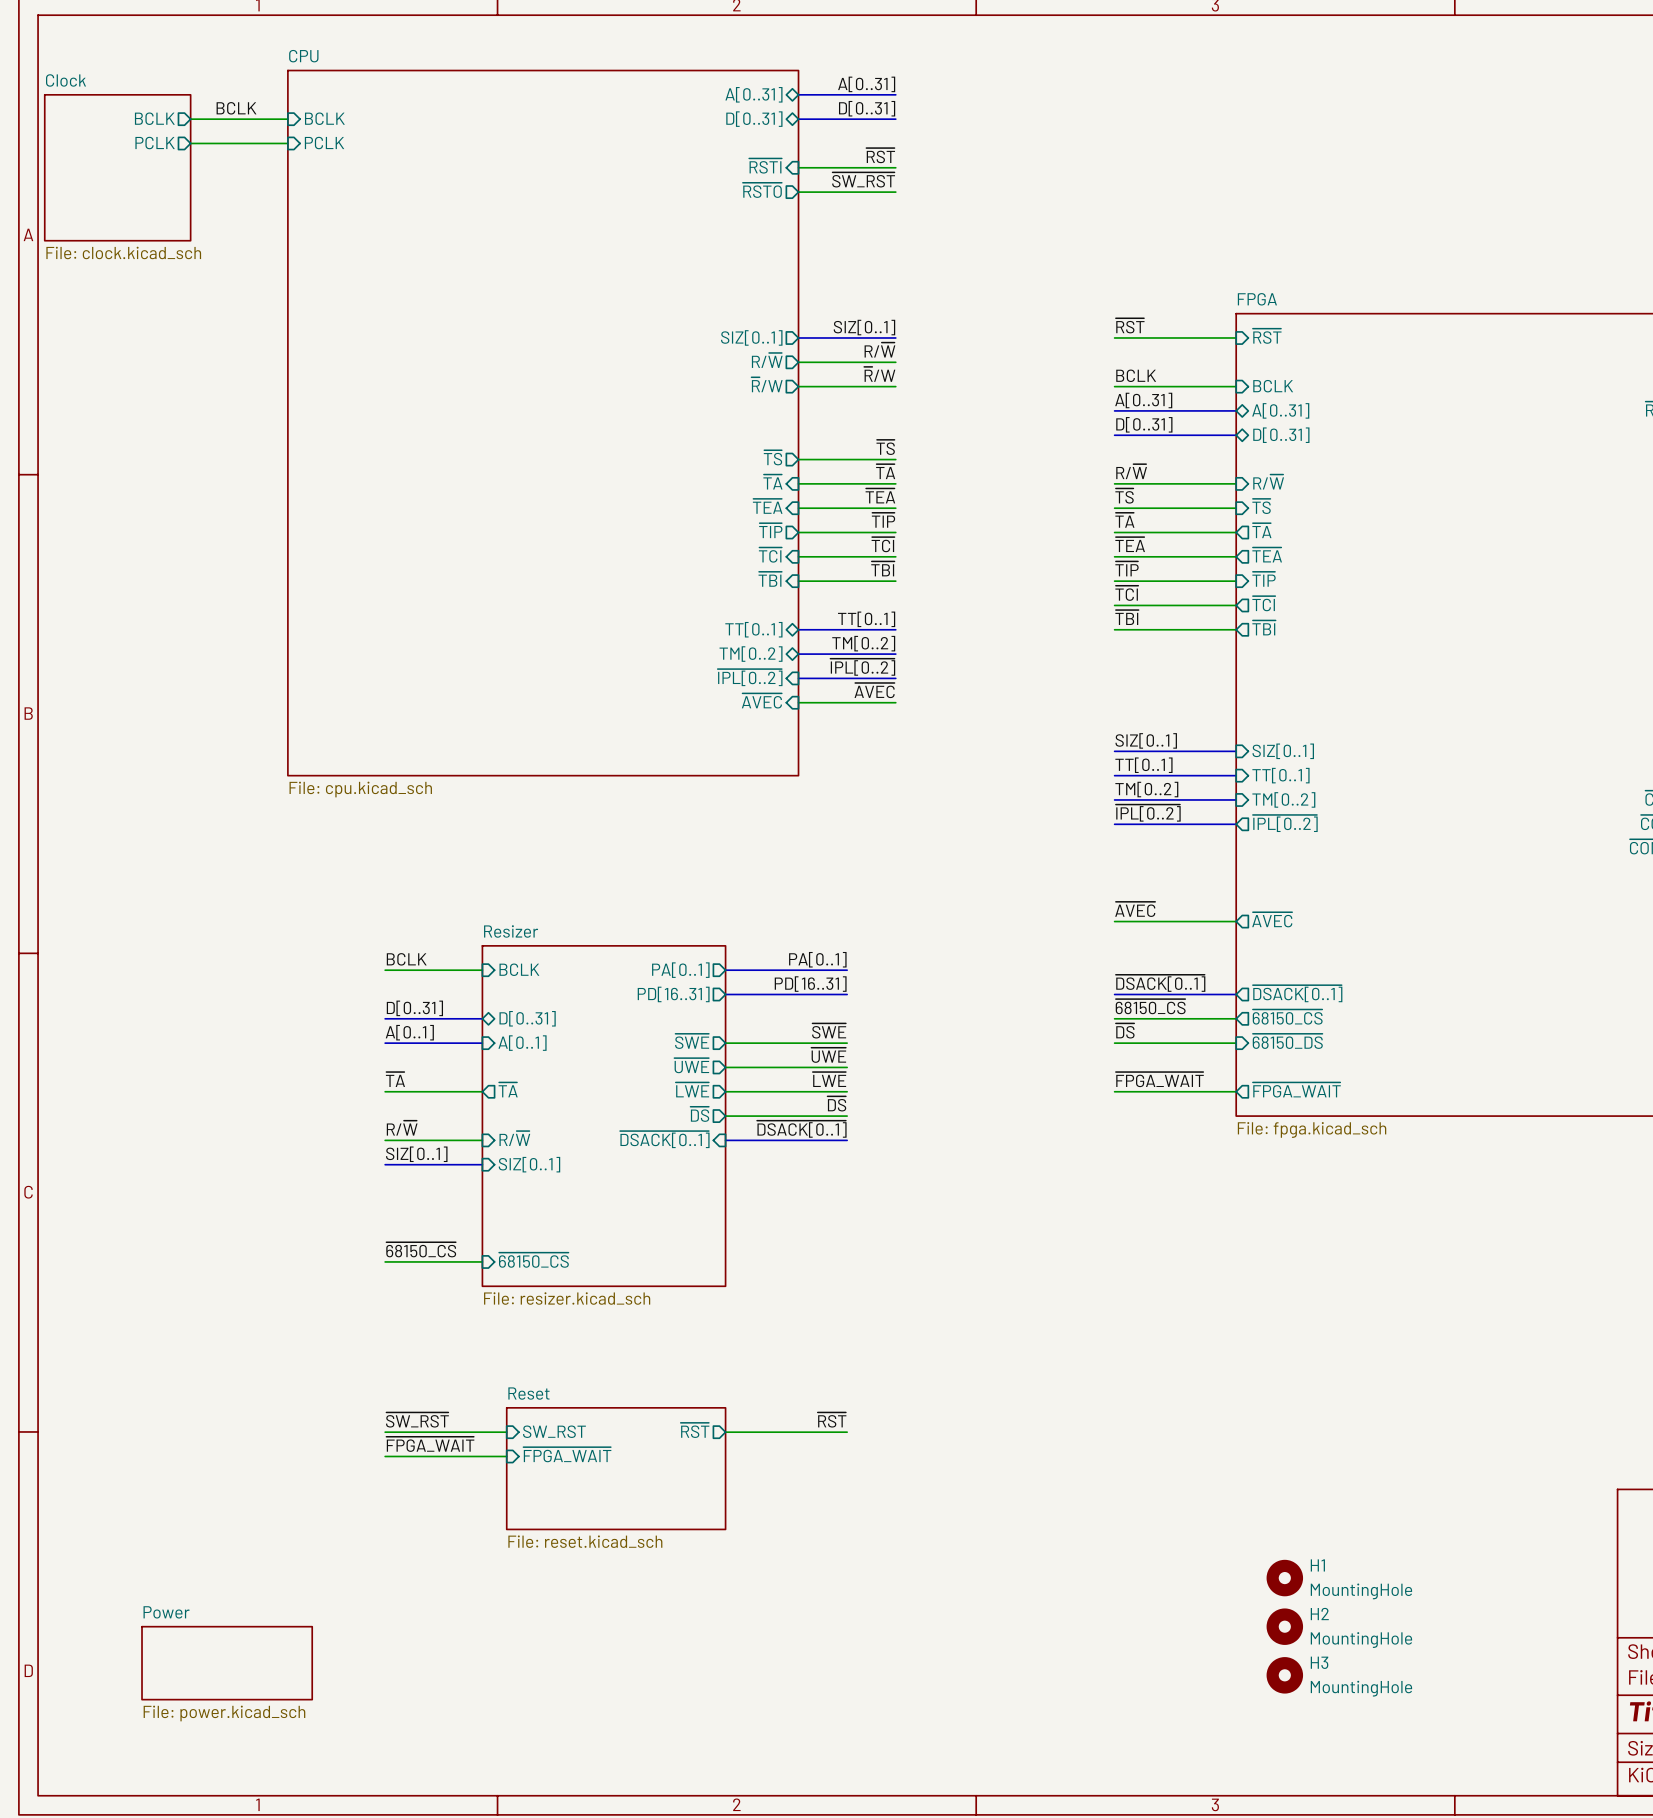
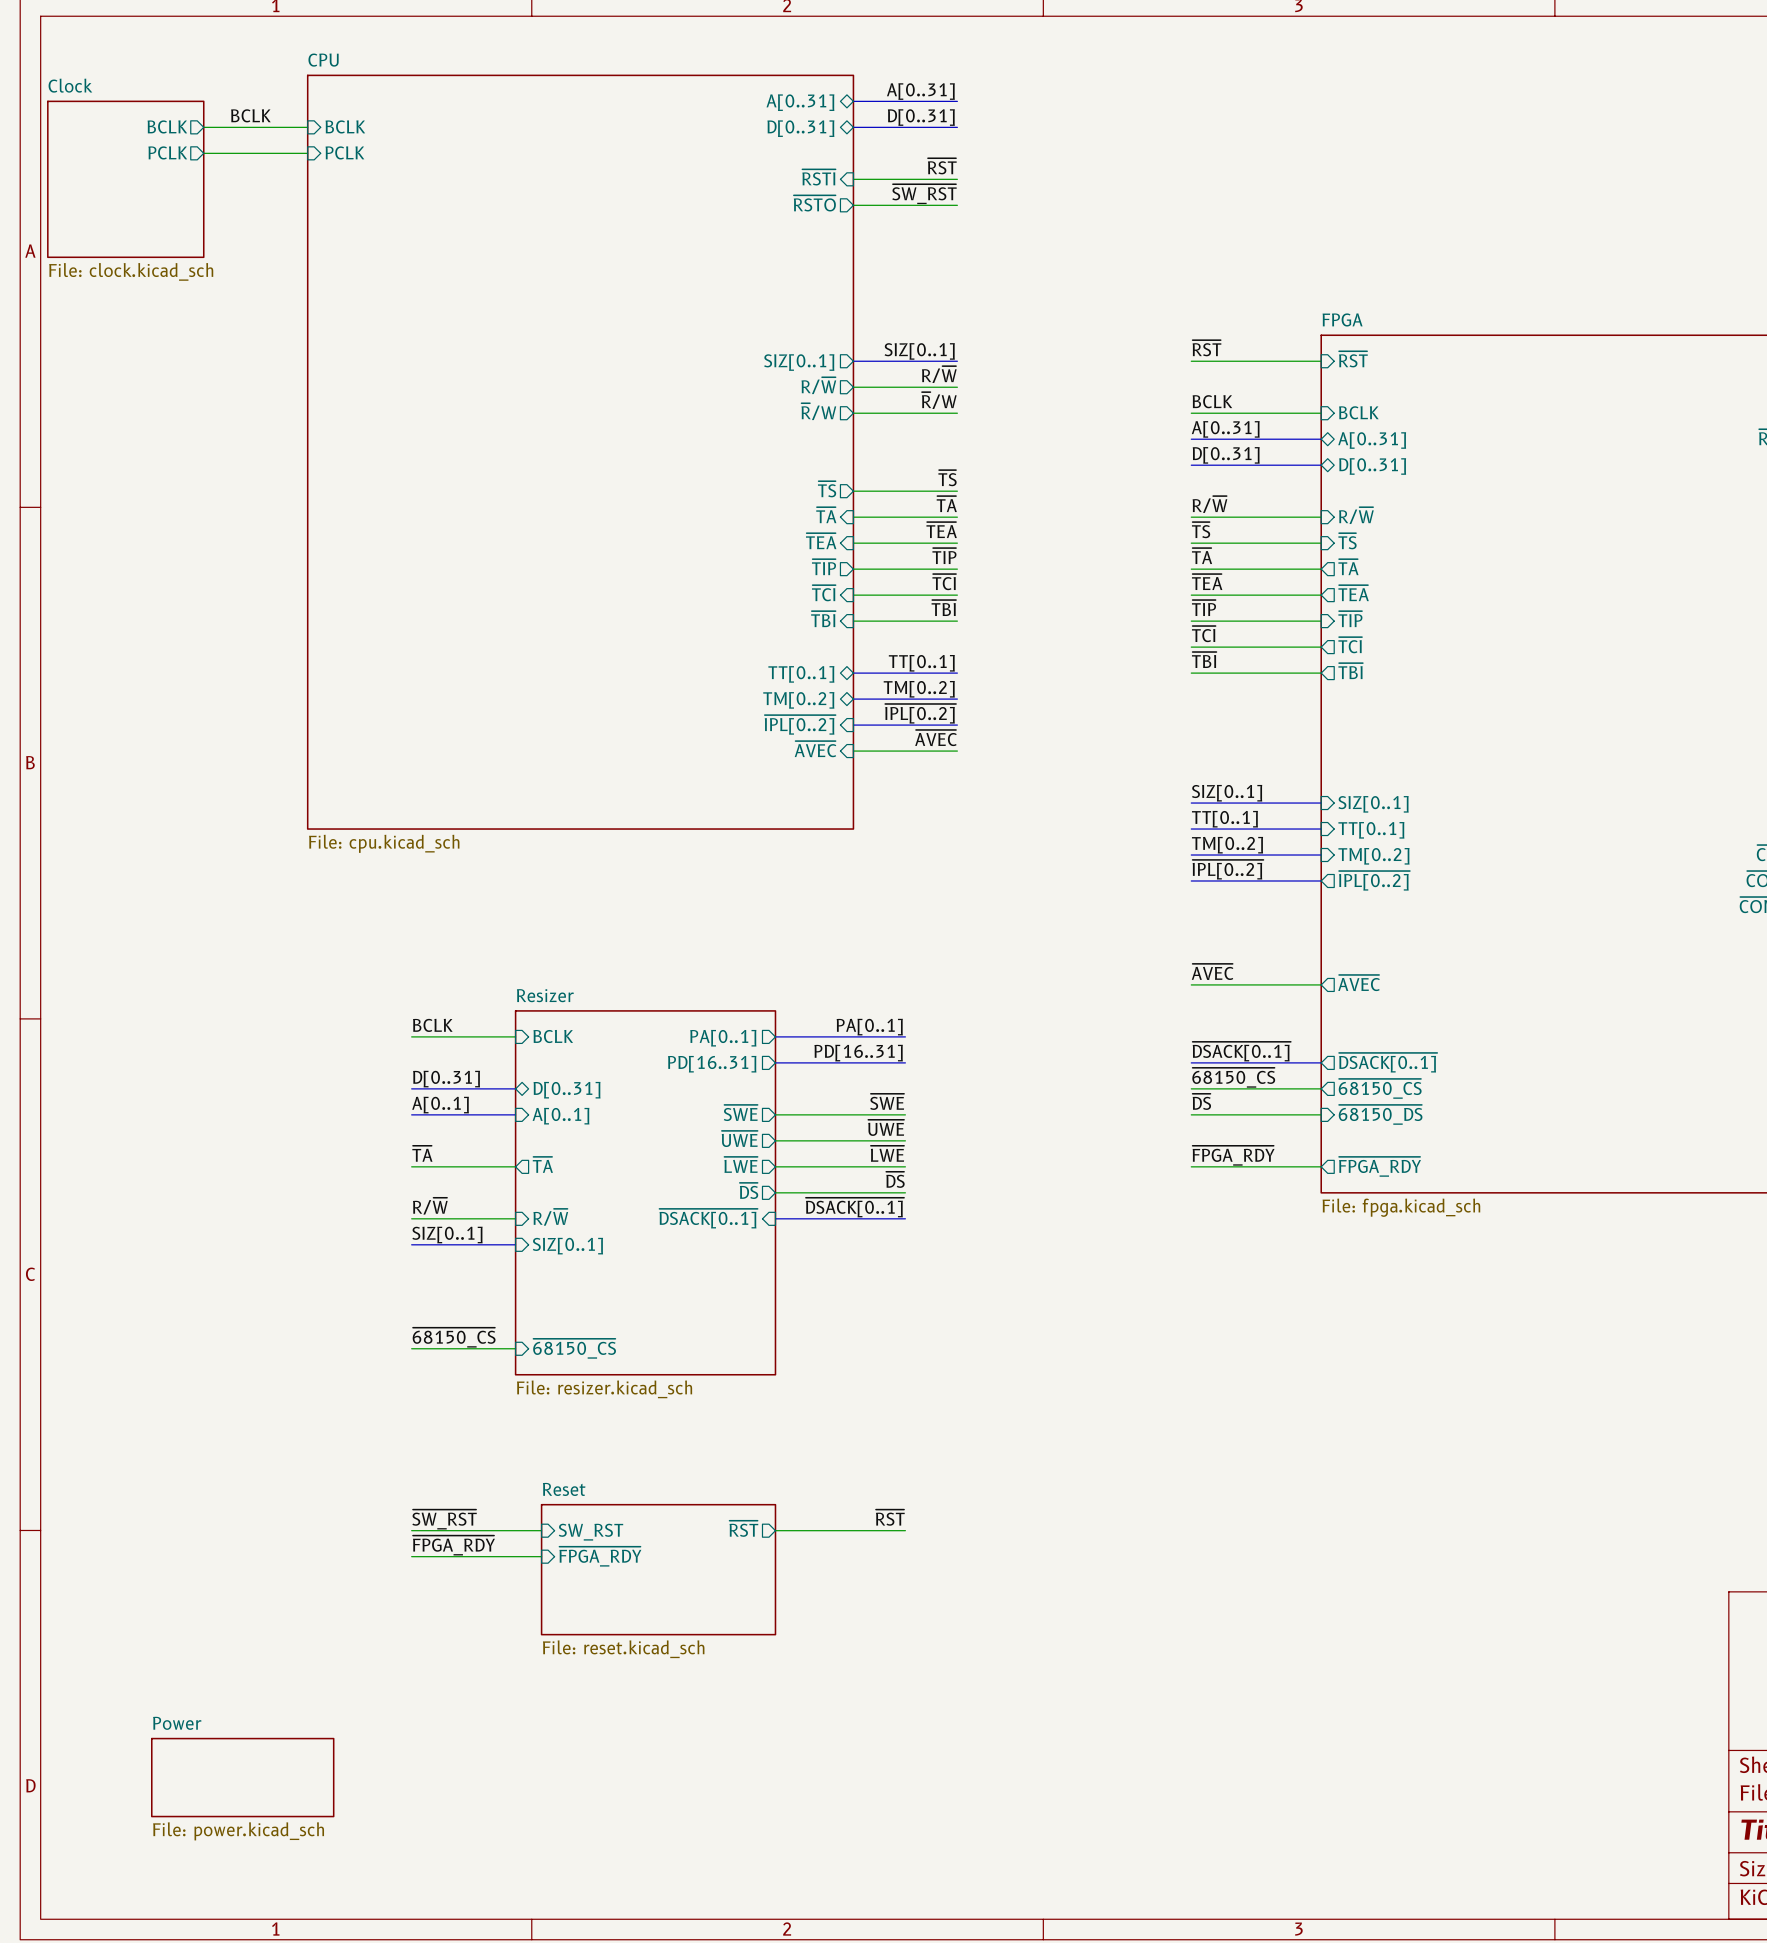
label: ~{FPGA_WAIT} (1159, 1079) -> ~{FPGA_RDY} (1233, 1155)
sheet pin: ~{FPGA_WAIT} (1296, 1089) -> ~{FPGA_RDY} (1380, 1166)
label: ~{FPGA_WAIT} (430, 1444) -> ~{FPGA_RDY} (453, 1545)
sheet pin: ~{FPGA_WAIT} (567, 1454) -> ~{FPGA_RDY} (600, 1556)
H1: MountingHole (1284, 1578) -> none
H2: MountingHole (1284, 1626) -> none
H3: MountingHole (1284, 1675) -> none

